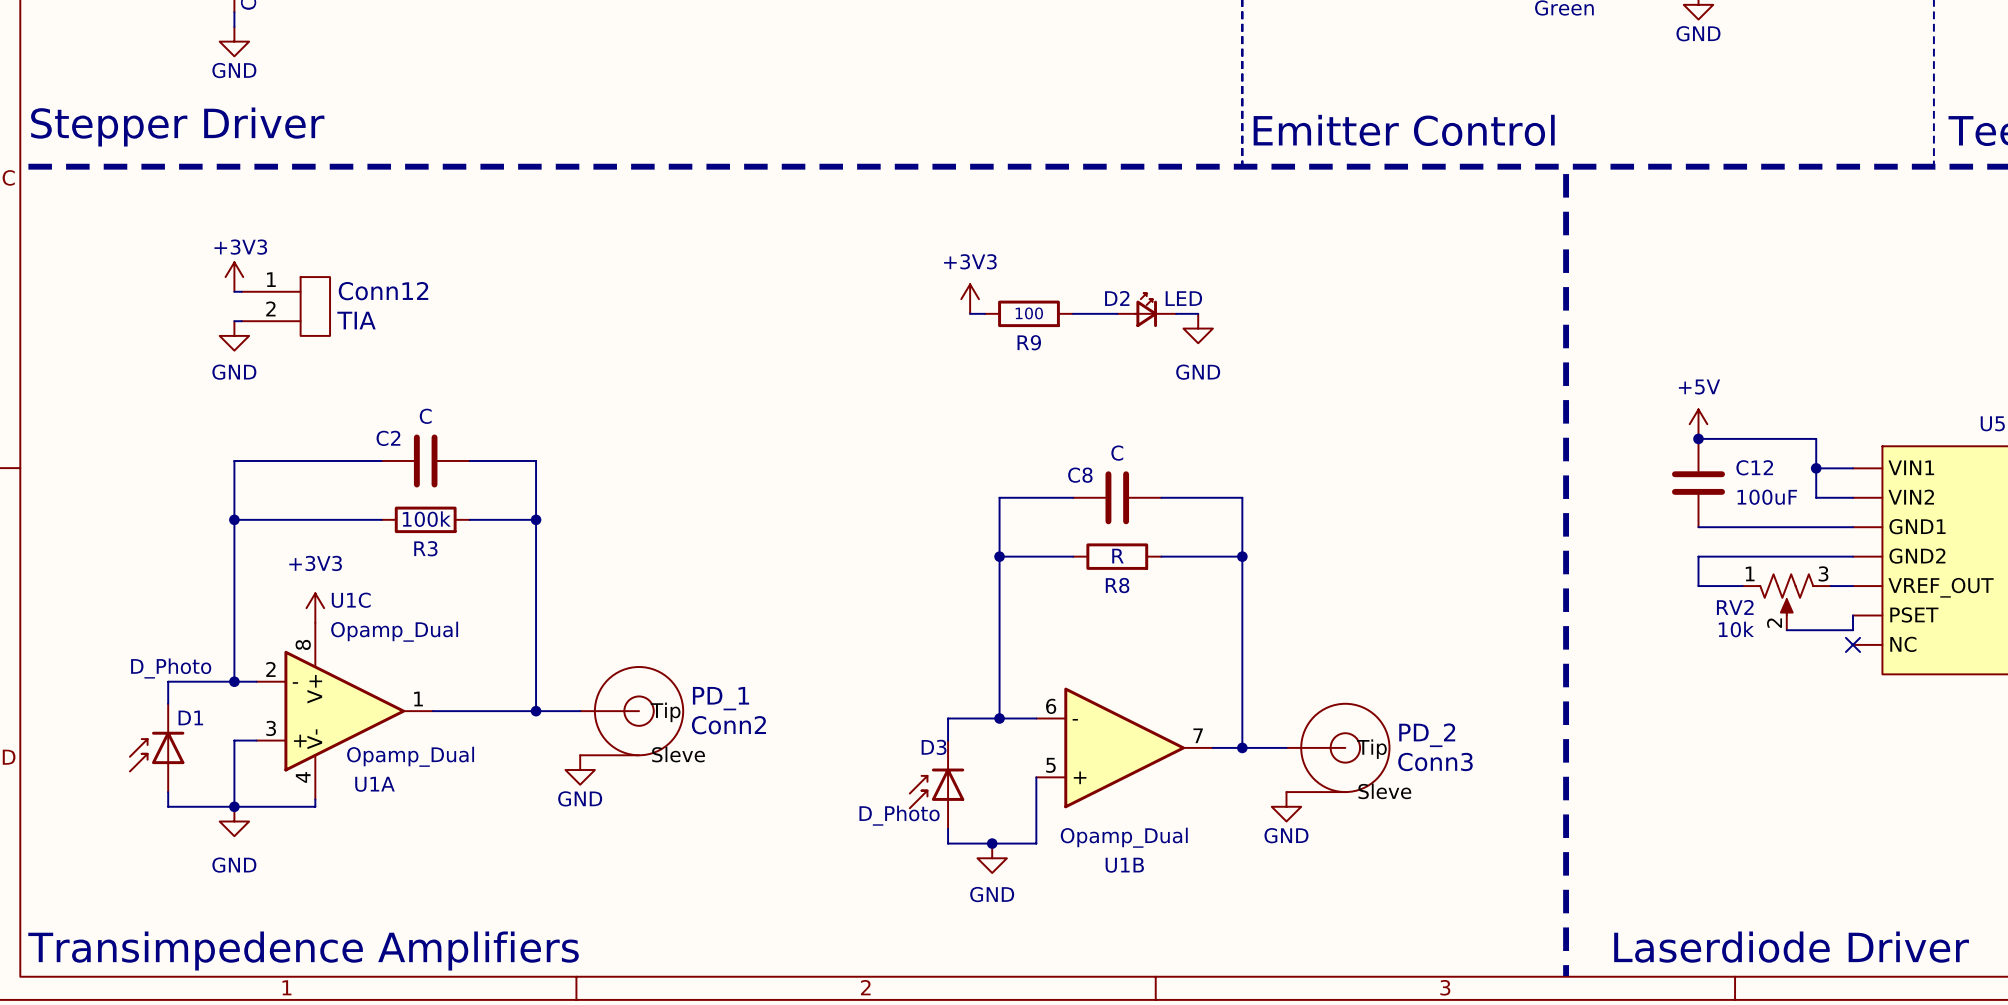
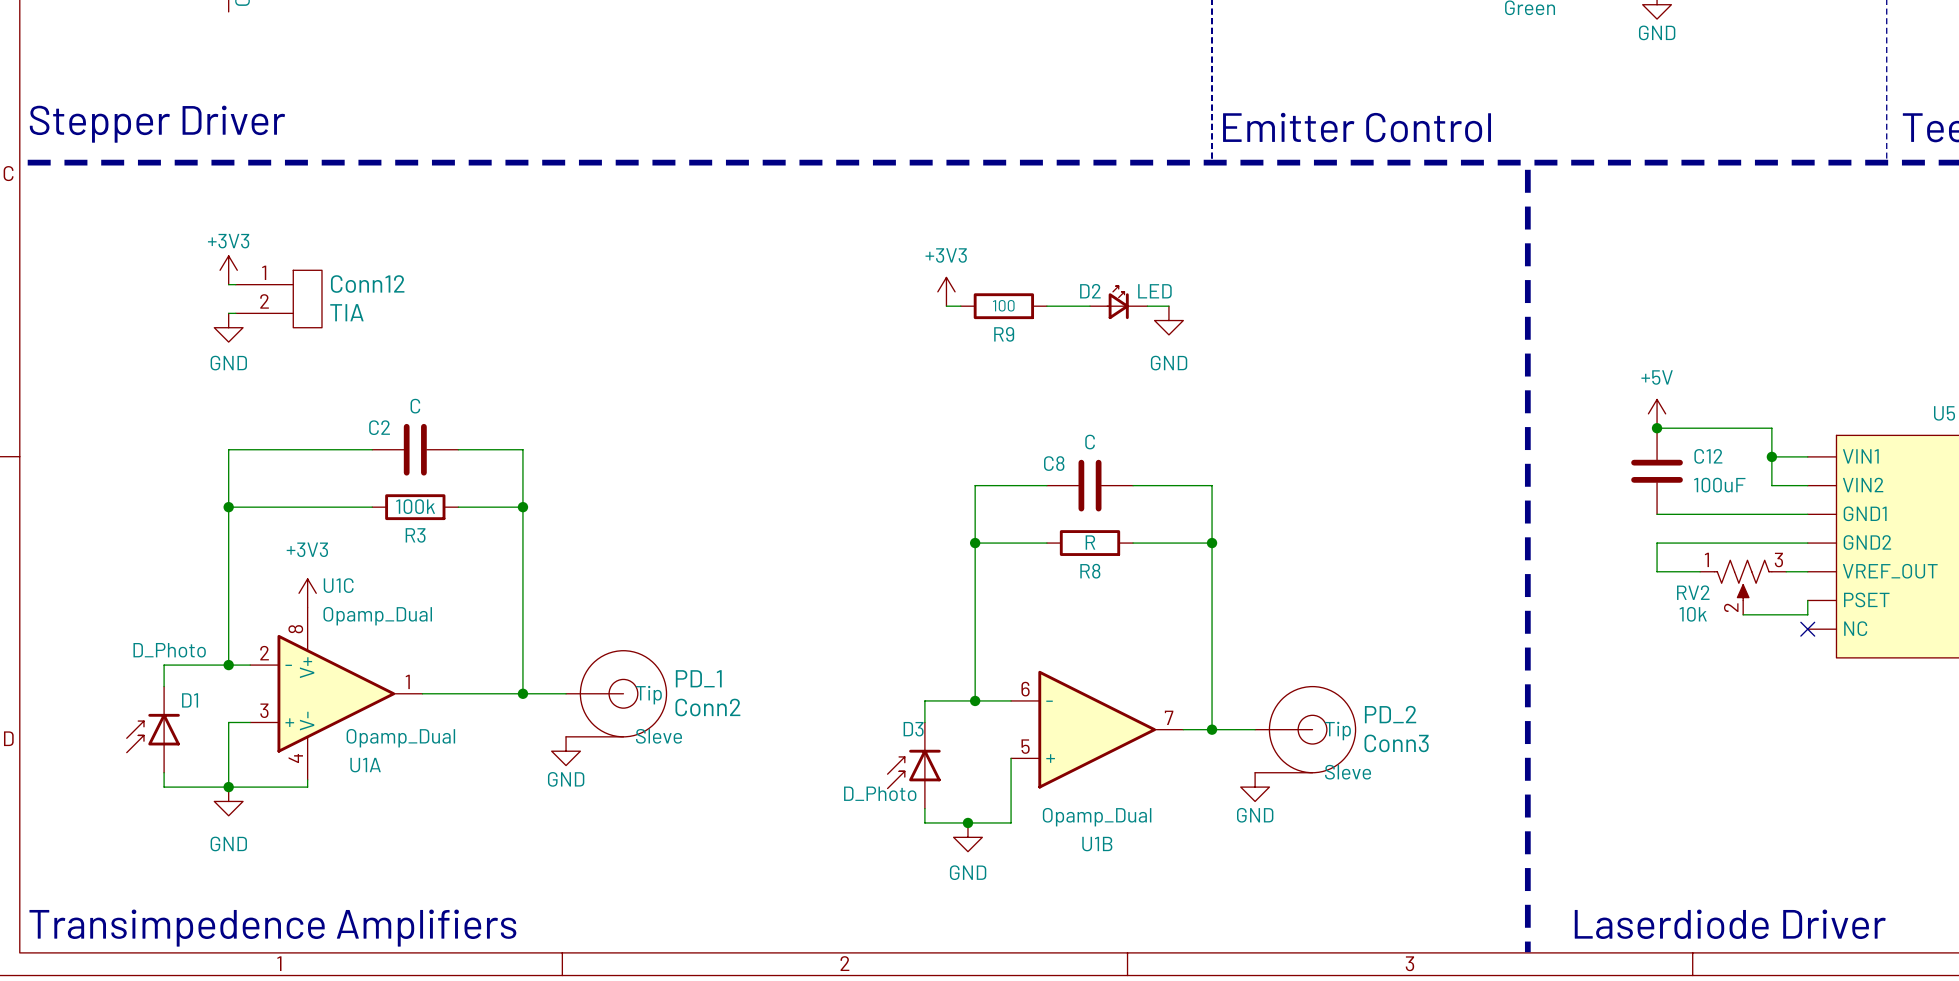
wire: (234, 12) (234, 26) -> none
power symbol: GND (234, 41) -> none

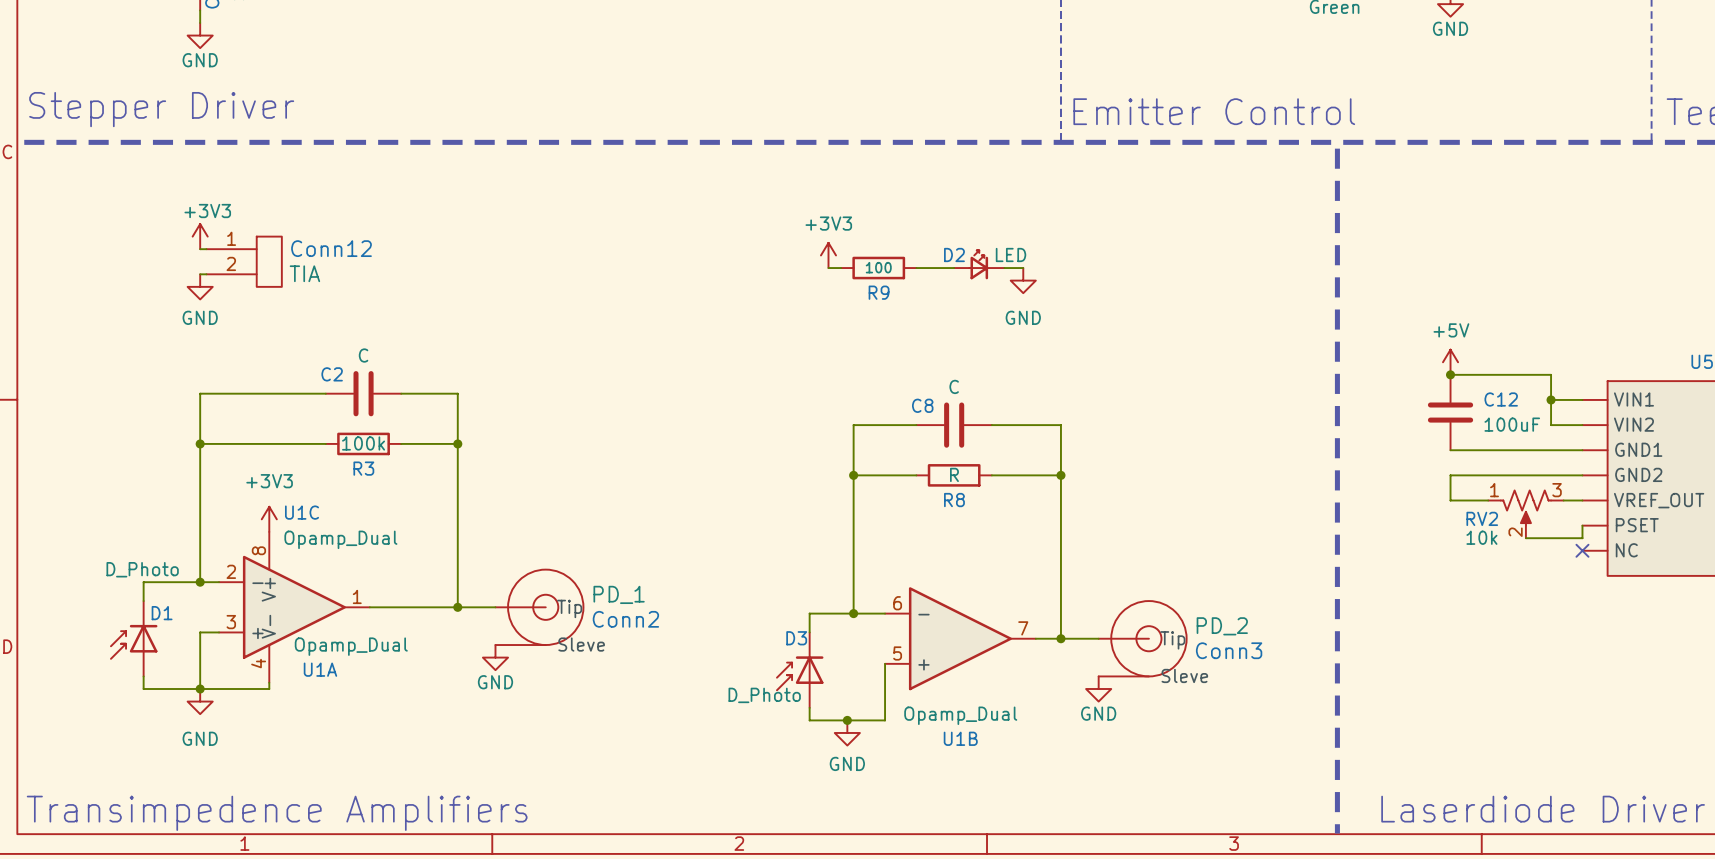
wire: none -> (200, 10) (200, 22)
power symbol: none -> GND (200, 35)

